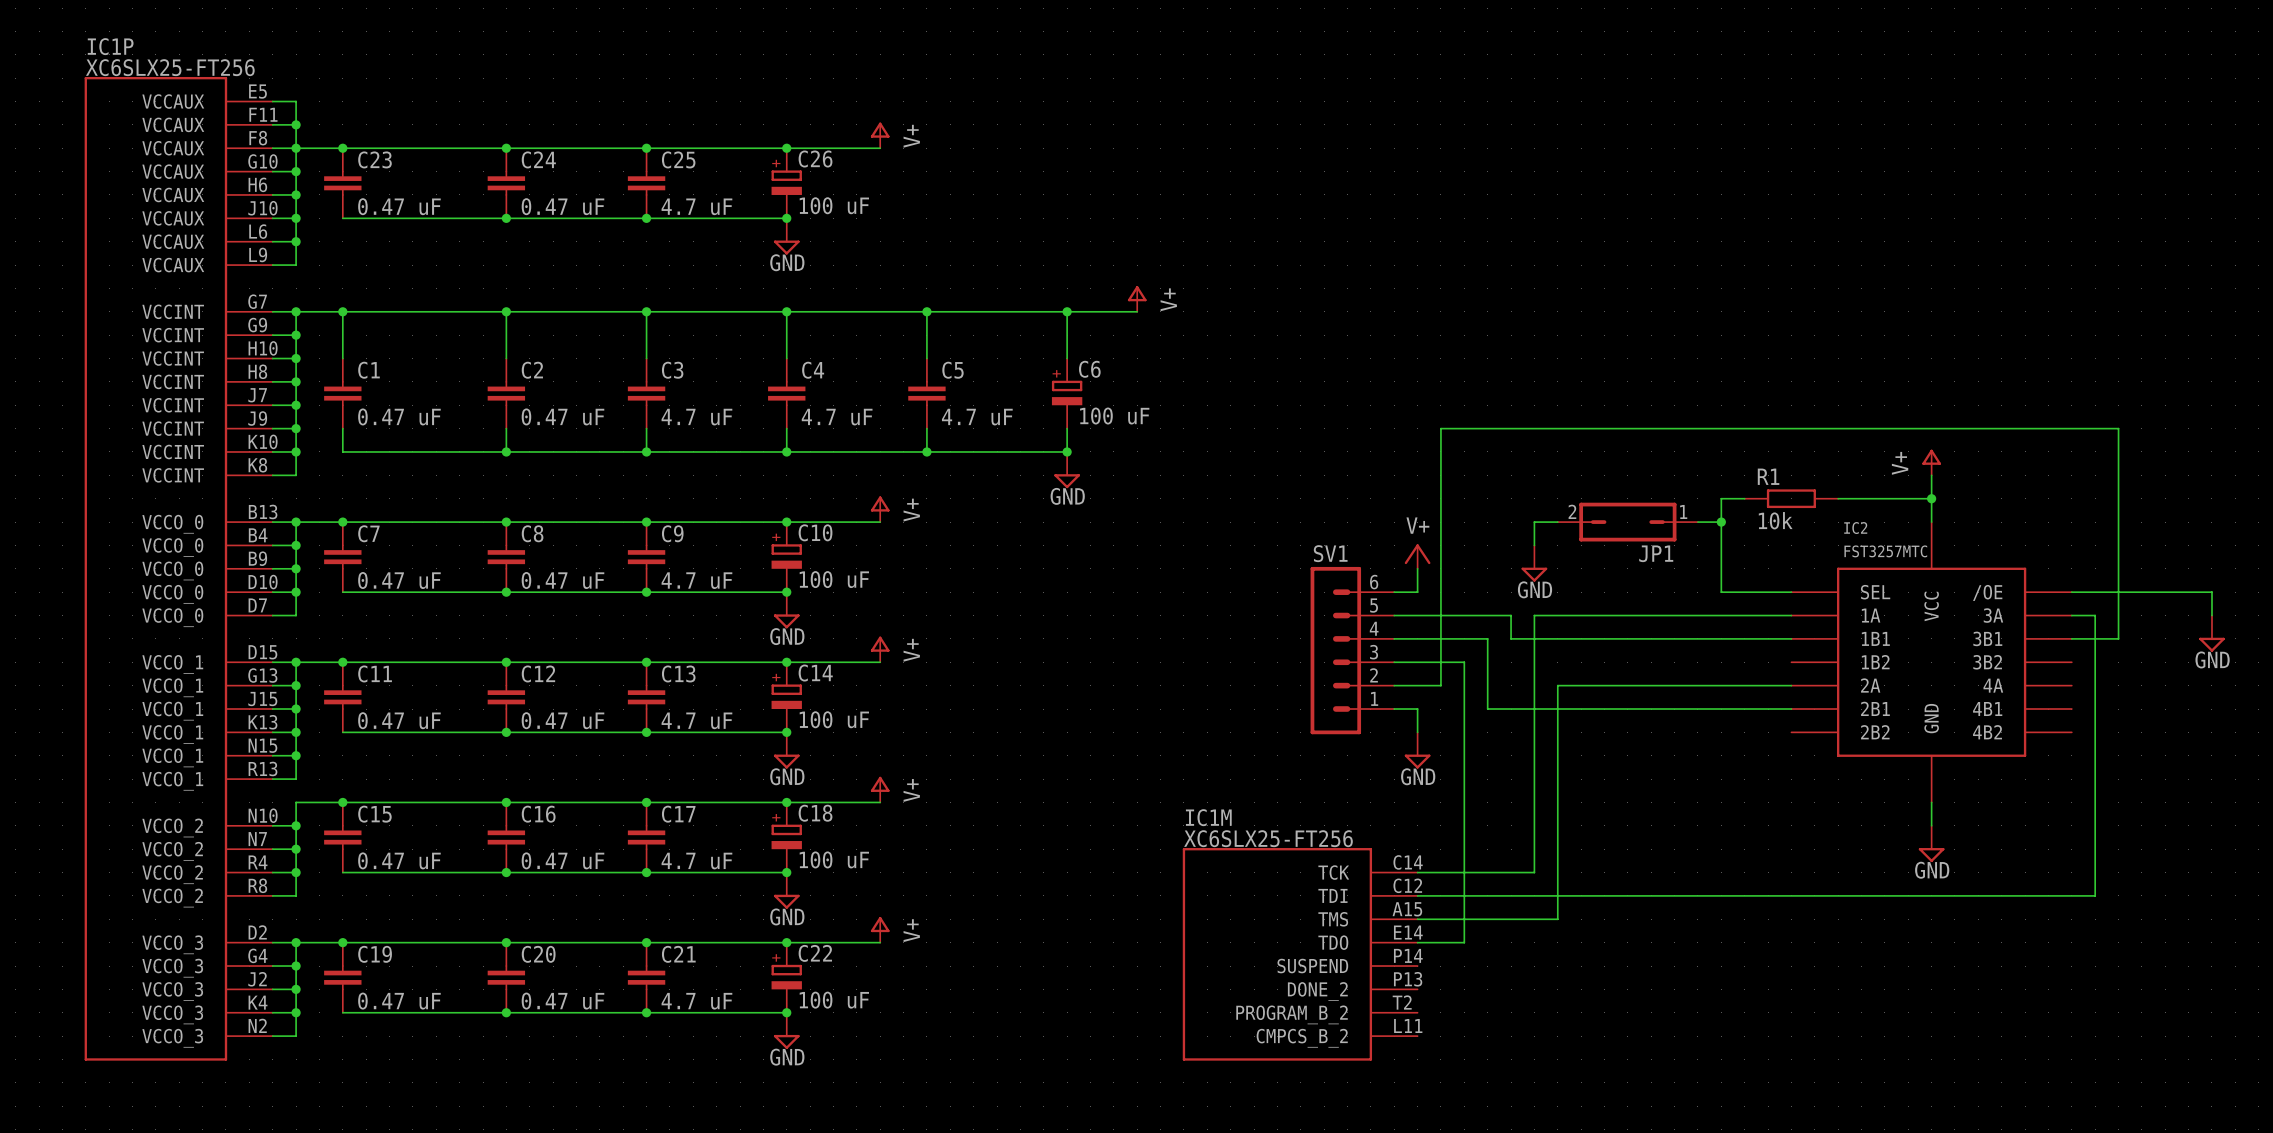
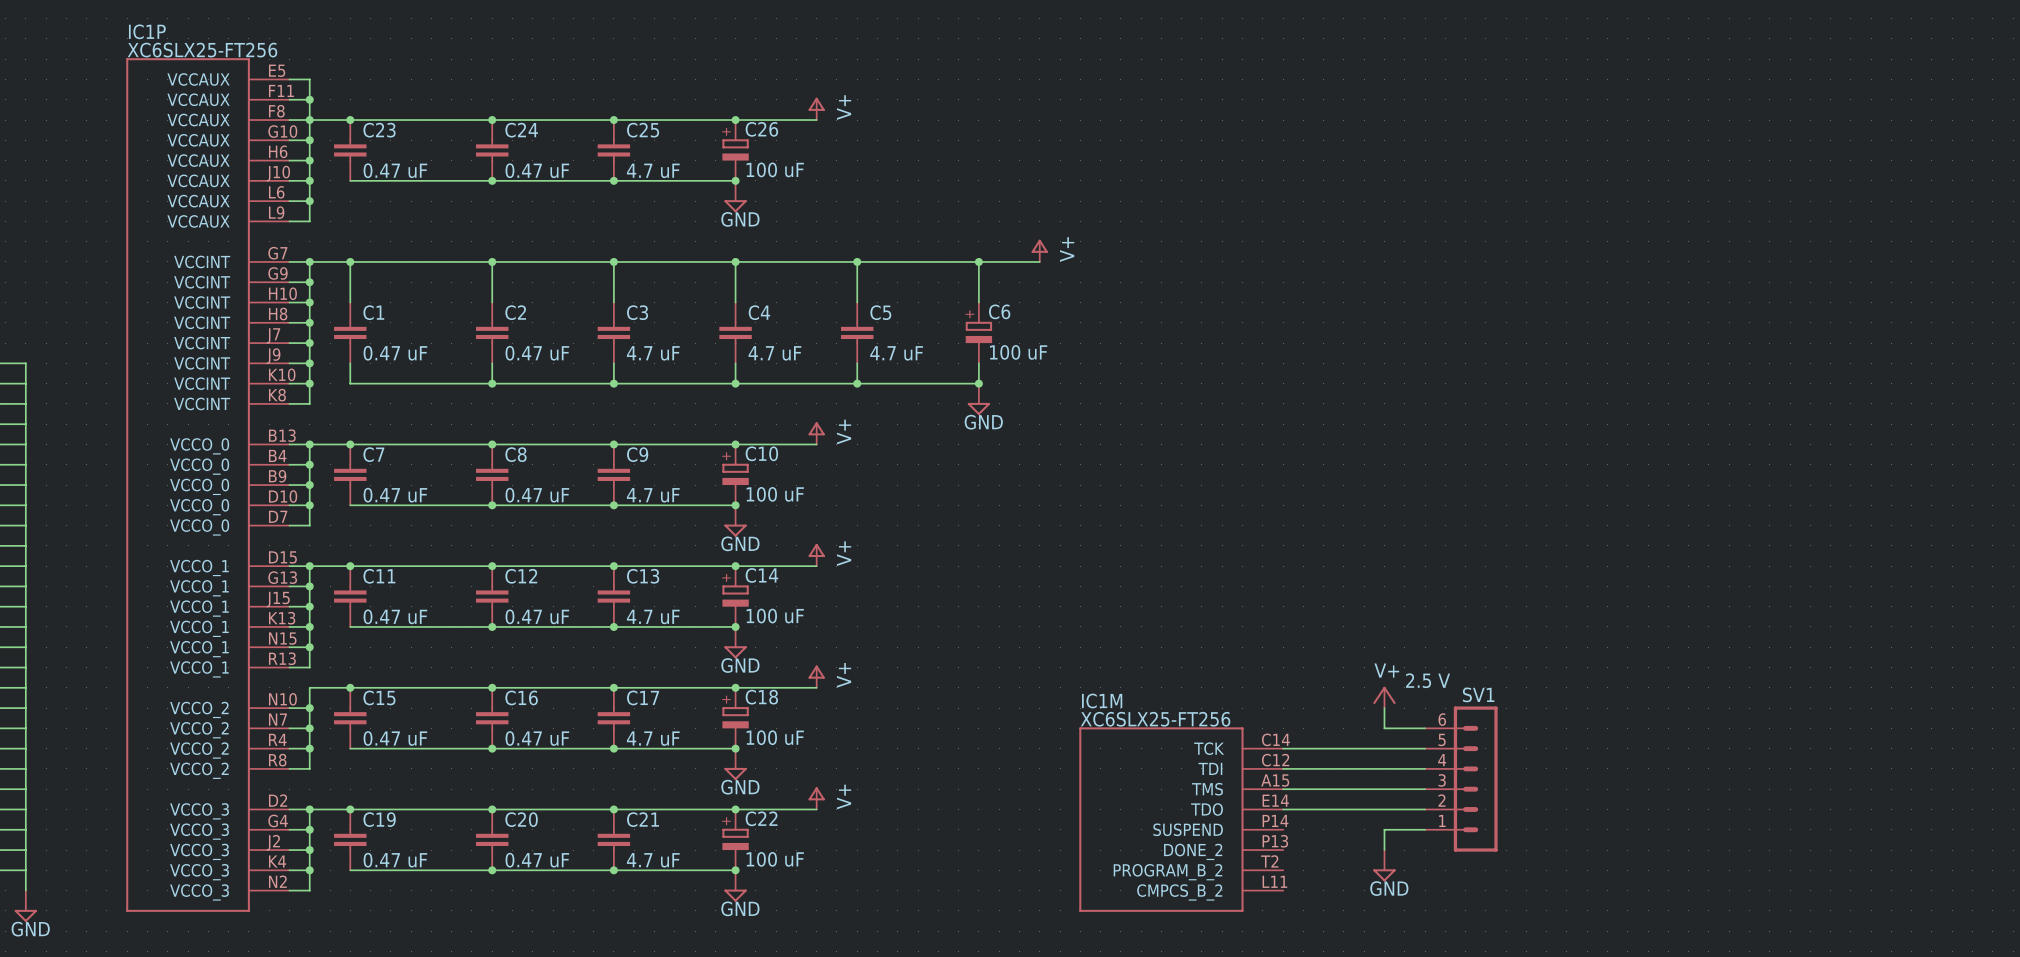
power symbol: V+ (1931, 462) -> none
wire: (1931, 475) (1931, 522) -> none
wire: (1744, 498) (1721, 498) (1721, 592) (1791, 592) -> none
R1: 10k (1791, 498) -> none
wire: (1838, 498) (1931, 498) -> none
junction: (1931, 498) -> none
wire: (1557, 522) (1534, 522) (1534, 545) -> none
JP1: (1627, 522) -> none
wire: (1697, 522) (1721, 522) -> none
junction: (1721, 522) -> none
power symbol: V+ (1417, 556) -> none
power symbol: GND (1534, 563) -> none
wire: (1417, 568) (1417, 592) (1394, 592) -> none
wire: (2071, 592) (2211, 592) (2211, 615) -> none
wire: (1394, 615) (1511, 615) (1511, 638) (1791, 638) -> none
wire: (1791, 615) (1534, 615) (1534, 825) -> none
wire: (2071, 615) (2095, 615) (2095, 895) (1581, 895) -> none
power symbol: GND (2211, 633) -> none
wire: (1394, 638) (1487, 638) (1487, 709) (1791, 709) -> none
wire: (2071, 638) (2118, 638) (2118, 428) (1440, 428) (1440, 685) (1394, 685) -> none
SV1 flip: as is (1335, 650) -> left-right (1475, 779)
SV1 position: (1352, 650) -> (1461, 779)
wire: (1394, 662) (1464, 662) (1464, 942) -> (1425, 809) (1323, 809)
IC2: FST3257MTC (1931, 662) -> none
wire: (1791, 685) (1557, 685) (1557, 919) -> (1425, 789) (1404, 789)
wire: (1394, 709) (1417, 709) (1417, 732) -> none
power symbol: GND (1417, 750) -> none
wire: (1931, 802) (1931, 825) -> none
power symbol: none -> V+ (1384, 697)
power symbol: GND (1931, 843) -> none
wire: (1534, 849) (1534, 872) -> (1384, 728) (1425, 728)
wire: none -> (1384, 748) (1425, 748)
wire: none -> (1425, 829) (1384, 829) (1384, 850)
power symbol: none -> GND (1384, 865)

